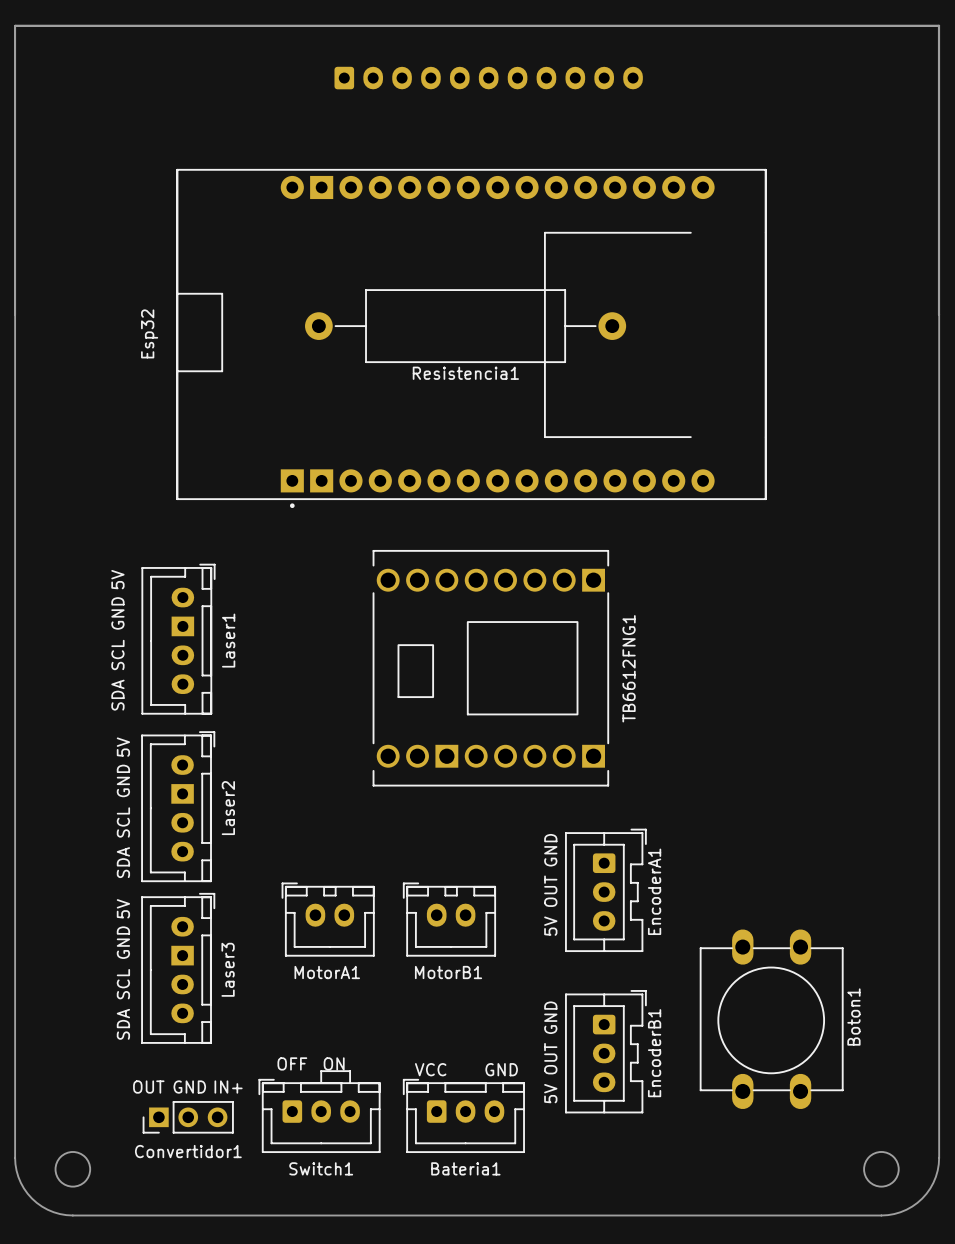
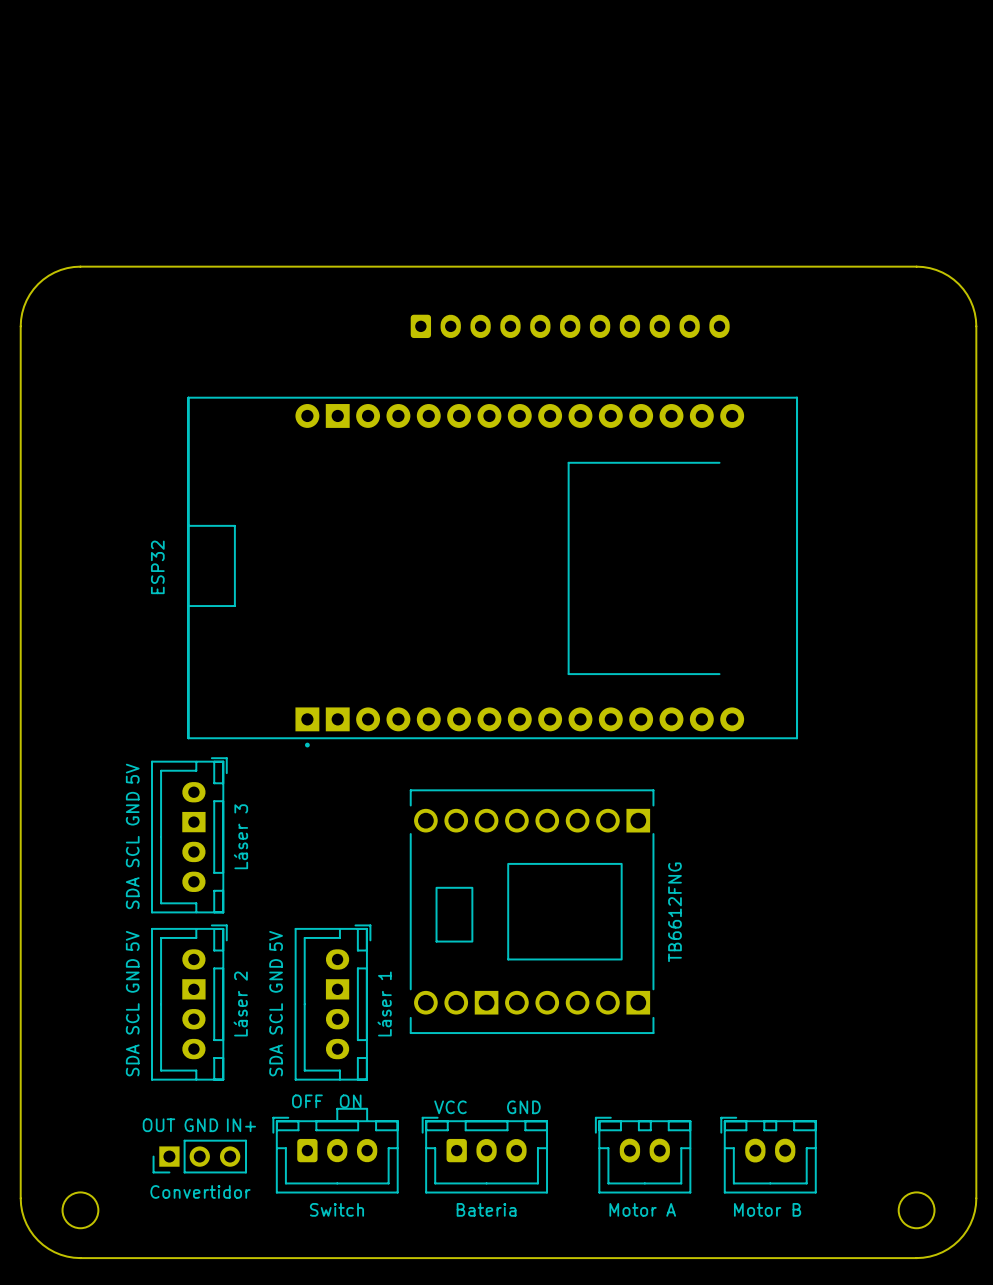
board edge: (938, 25) (938, 314) (939, 314) (939, 25) (15, 25) (15, 314) -> (976, 326) (970, 300) (958, 284) (942, 272) (916, 266) (73, 267) (48, 275) (33, 289) (24, 306) (20, 326)
part position: (488, 78) -> (570, 326)
Resistencia1: (465, 326) -> none
Esp32: (471, 338) -> none
ESP32: none -> (492, 572)
text: 5V (117, 579) -> none
text: GND (117, 613) -> none
Laser1: (178, 639) -> none
text: SCL (117, 654) -> none
TB6612FNG1: (490, 668) -> none
text: SDA (117, 695) -> none
Laser2 name: Laser2 (228, 808) -> Láser 3 (240, 836)
text: GND (550, 850) -> none
TB6612FNG: none -> (532, 911)
EncoderA1: (605, 890) -> none
text: OUT (550, 891) -> none
text: none -> 5V (276, 940)
MotorA1: (328, 919) -> none
MotorB1: (449, 919) -> none
text: 5V (550, 926) -> none
text: none -> GND (276, 975)
Láser 1: none -> (333, 1002)
Laser3 name: Laser3 (228, 969) -> Láser 2 (240, 1003)
text: none -> SCL (276, 1018)
text: GND (550, 1017) -> none
Boton1: (771, 1019) -> none
text: none -> SDA (276, 1060)
EncoderB1: (605, 1051) -> none
text: OUT (550, 1058) -> none
text: 5V (550, 1093) -> none
Motor A: none -> (643, 1155)
Motor B: none -> (768, 1155)
Convertidor1 name: Convertidor1 (188, 1151) -> Convertidor (200, 1191)
Switch1 name: Switch1 (321, 1168) -> Switch (336, 1209)
Bateria1 name: Bateria1 (465, 1168) -> Bateria (486, 1209)

